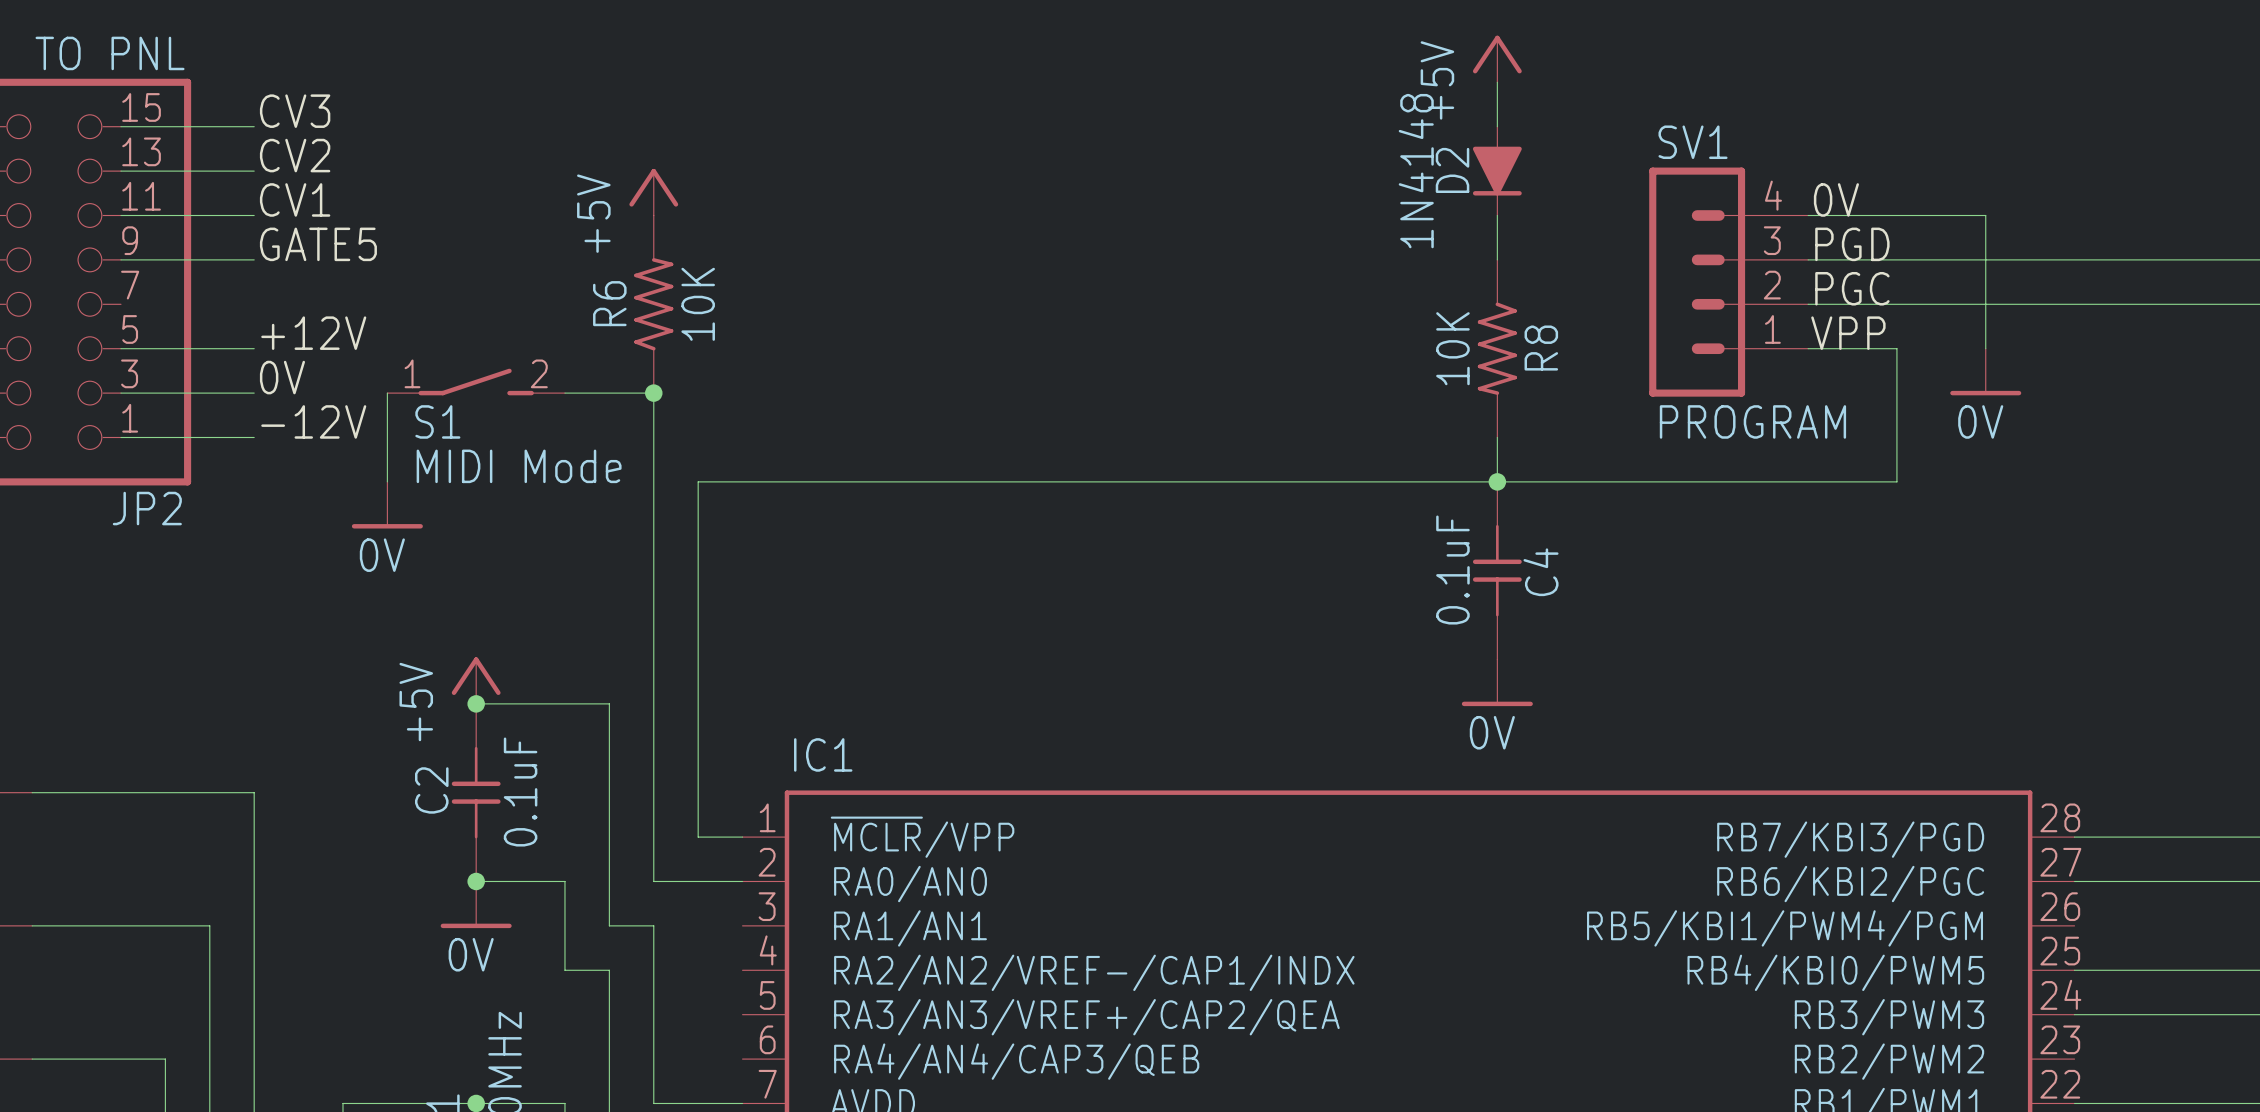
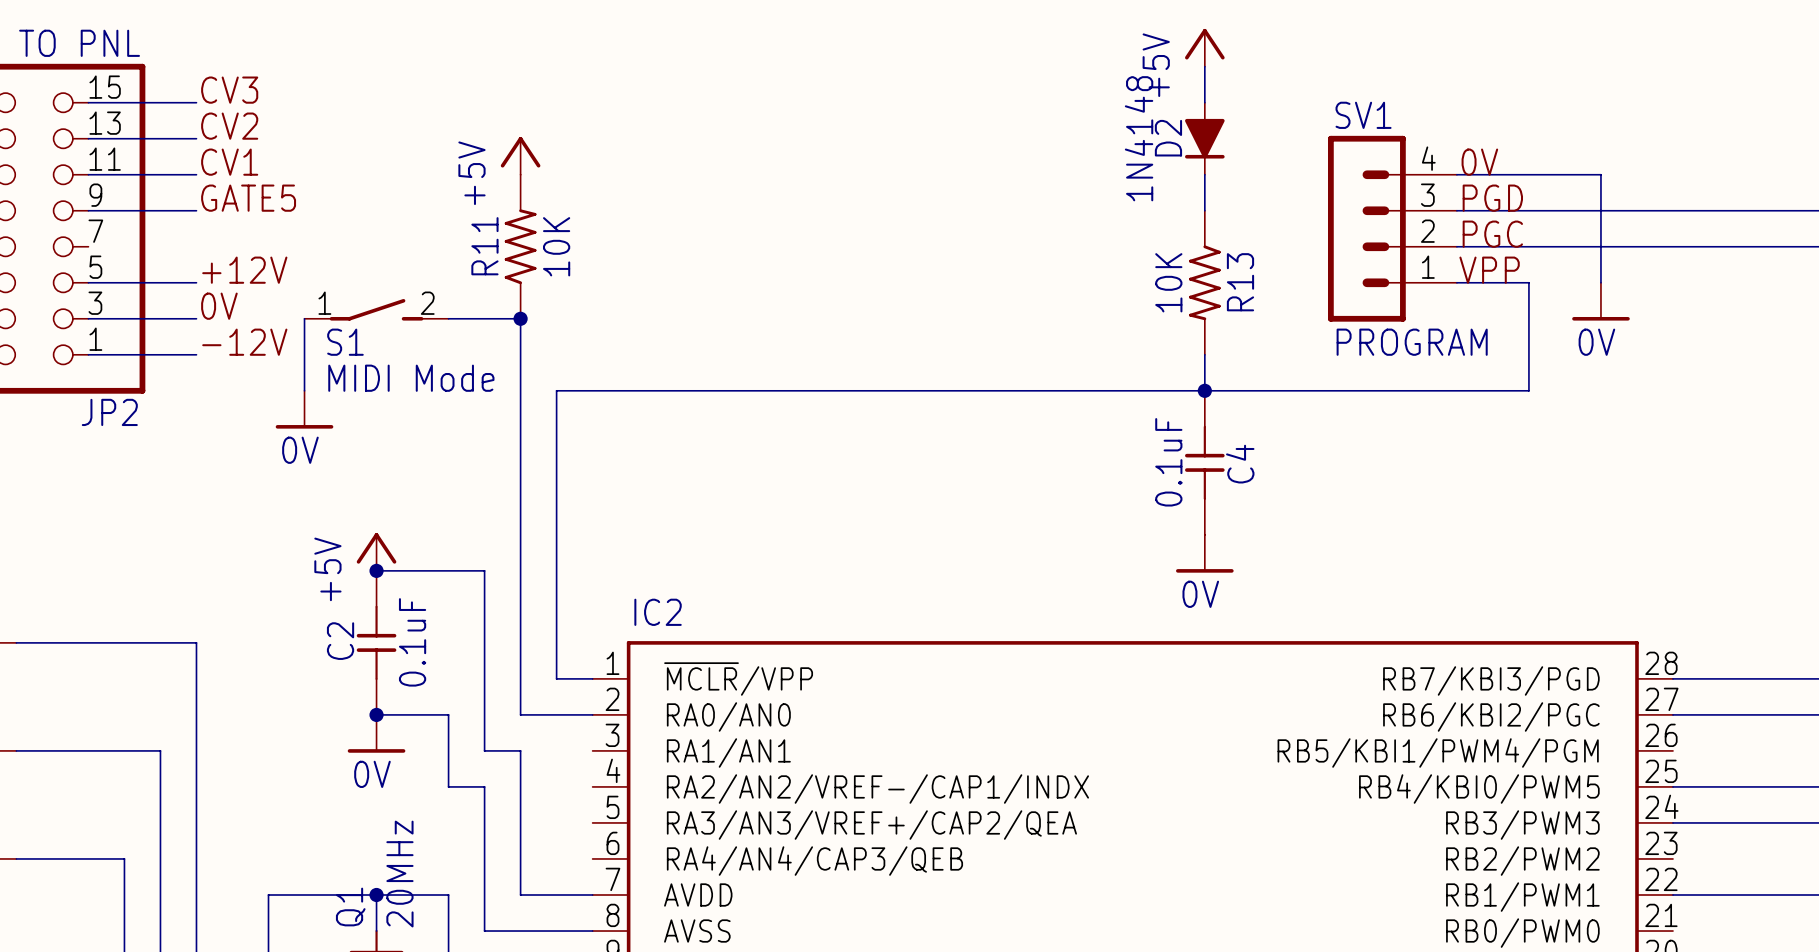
R6 name: R6 (609, 303) -> R11 (484, 246)
R8 name: R8 (1541, 348) -> R13 (1240, 282)
IC1 name: IC1 (823, 754) -> IC2 (658, 612)

